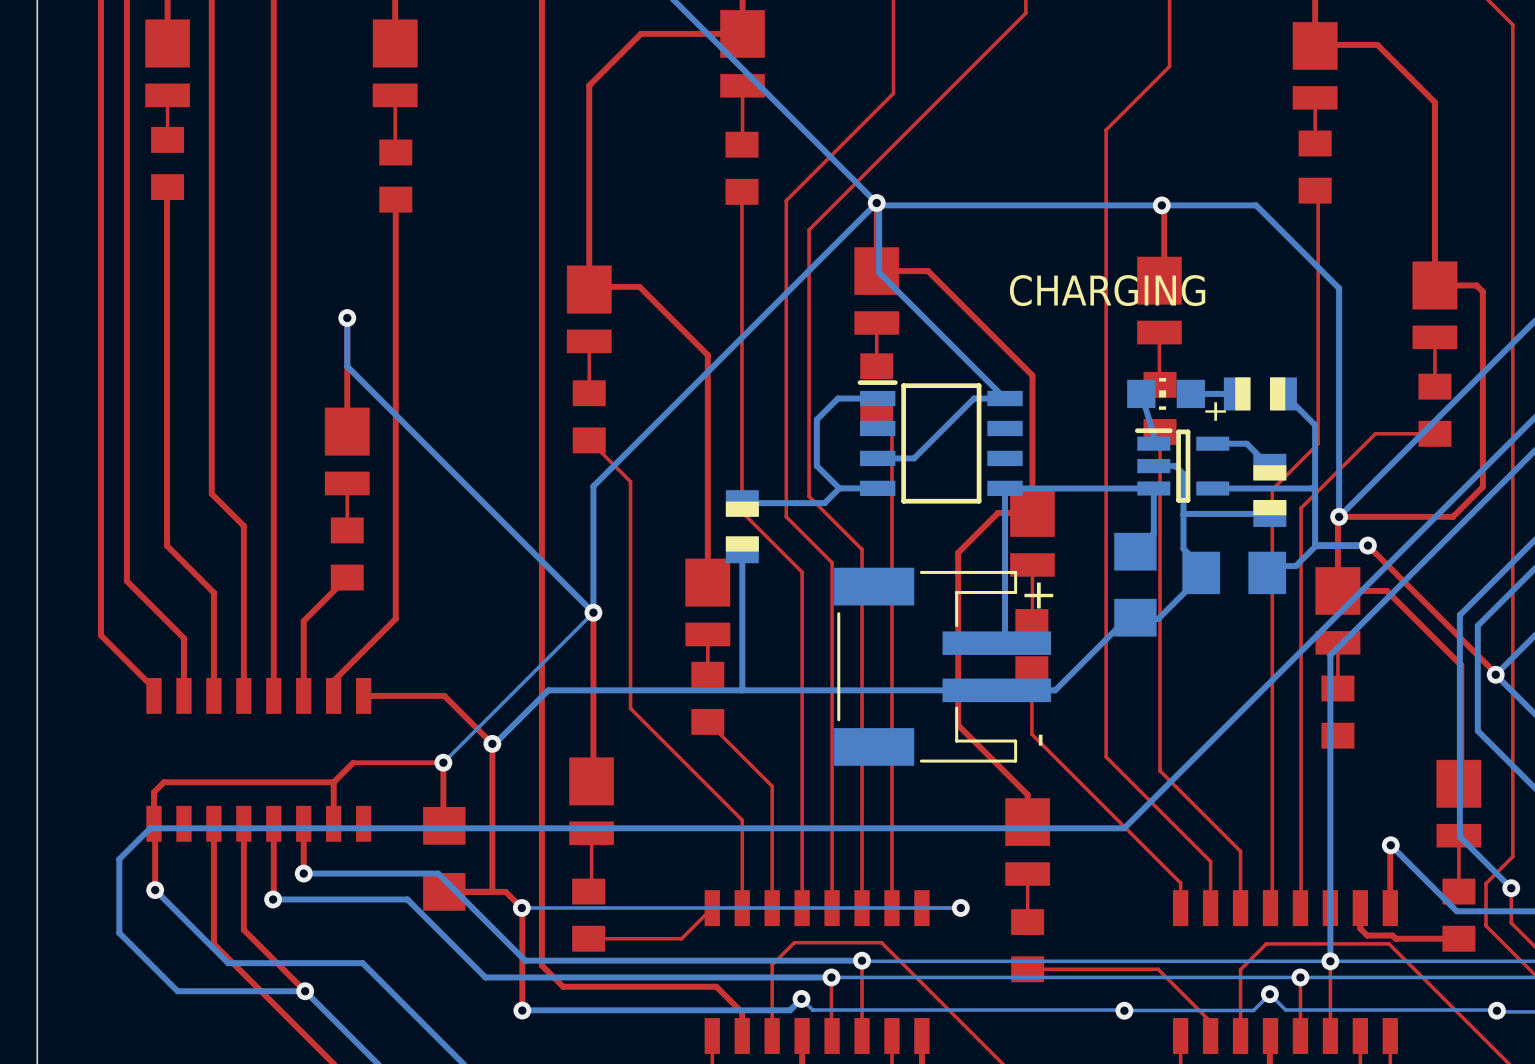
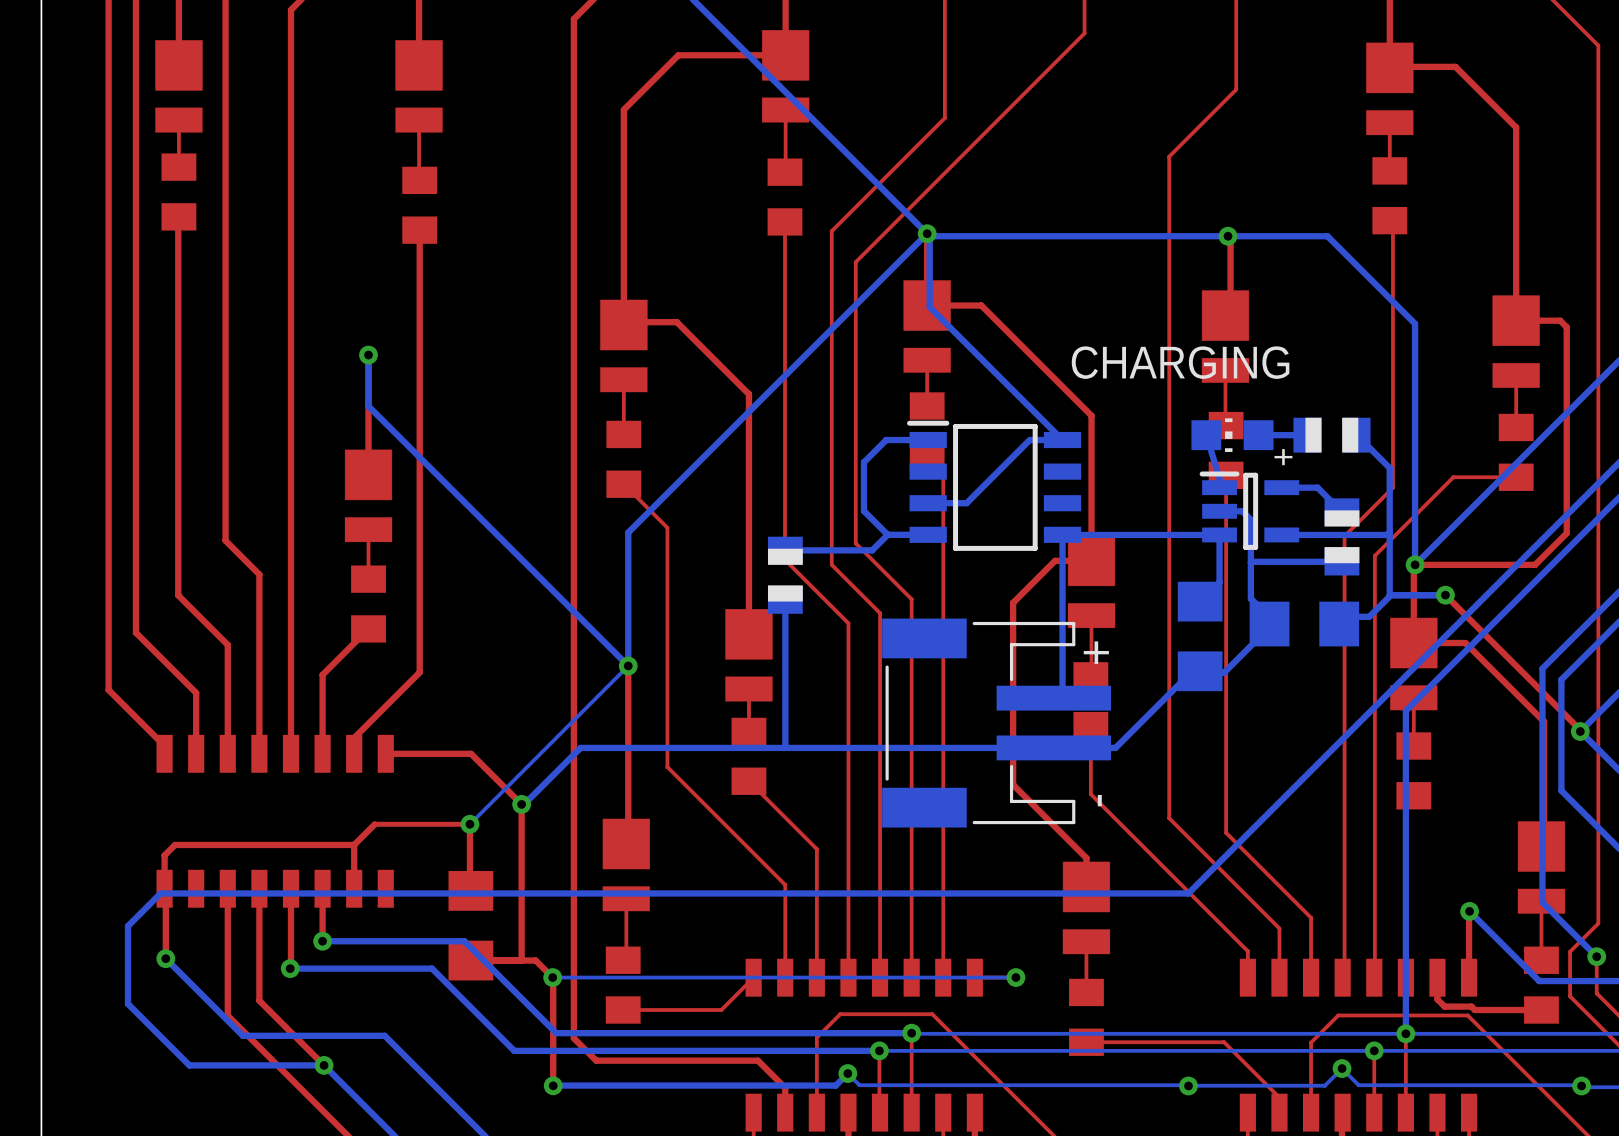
CHARGING name position: CHARGING (1107, 290) -> CHARGING (1180, 362)

